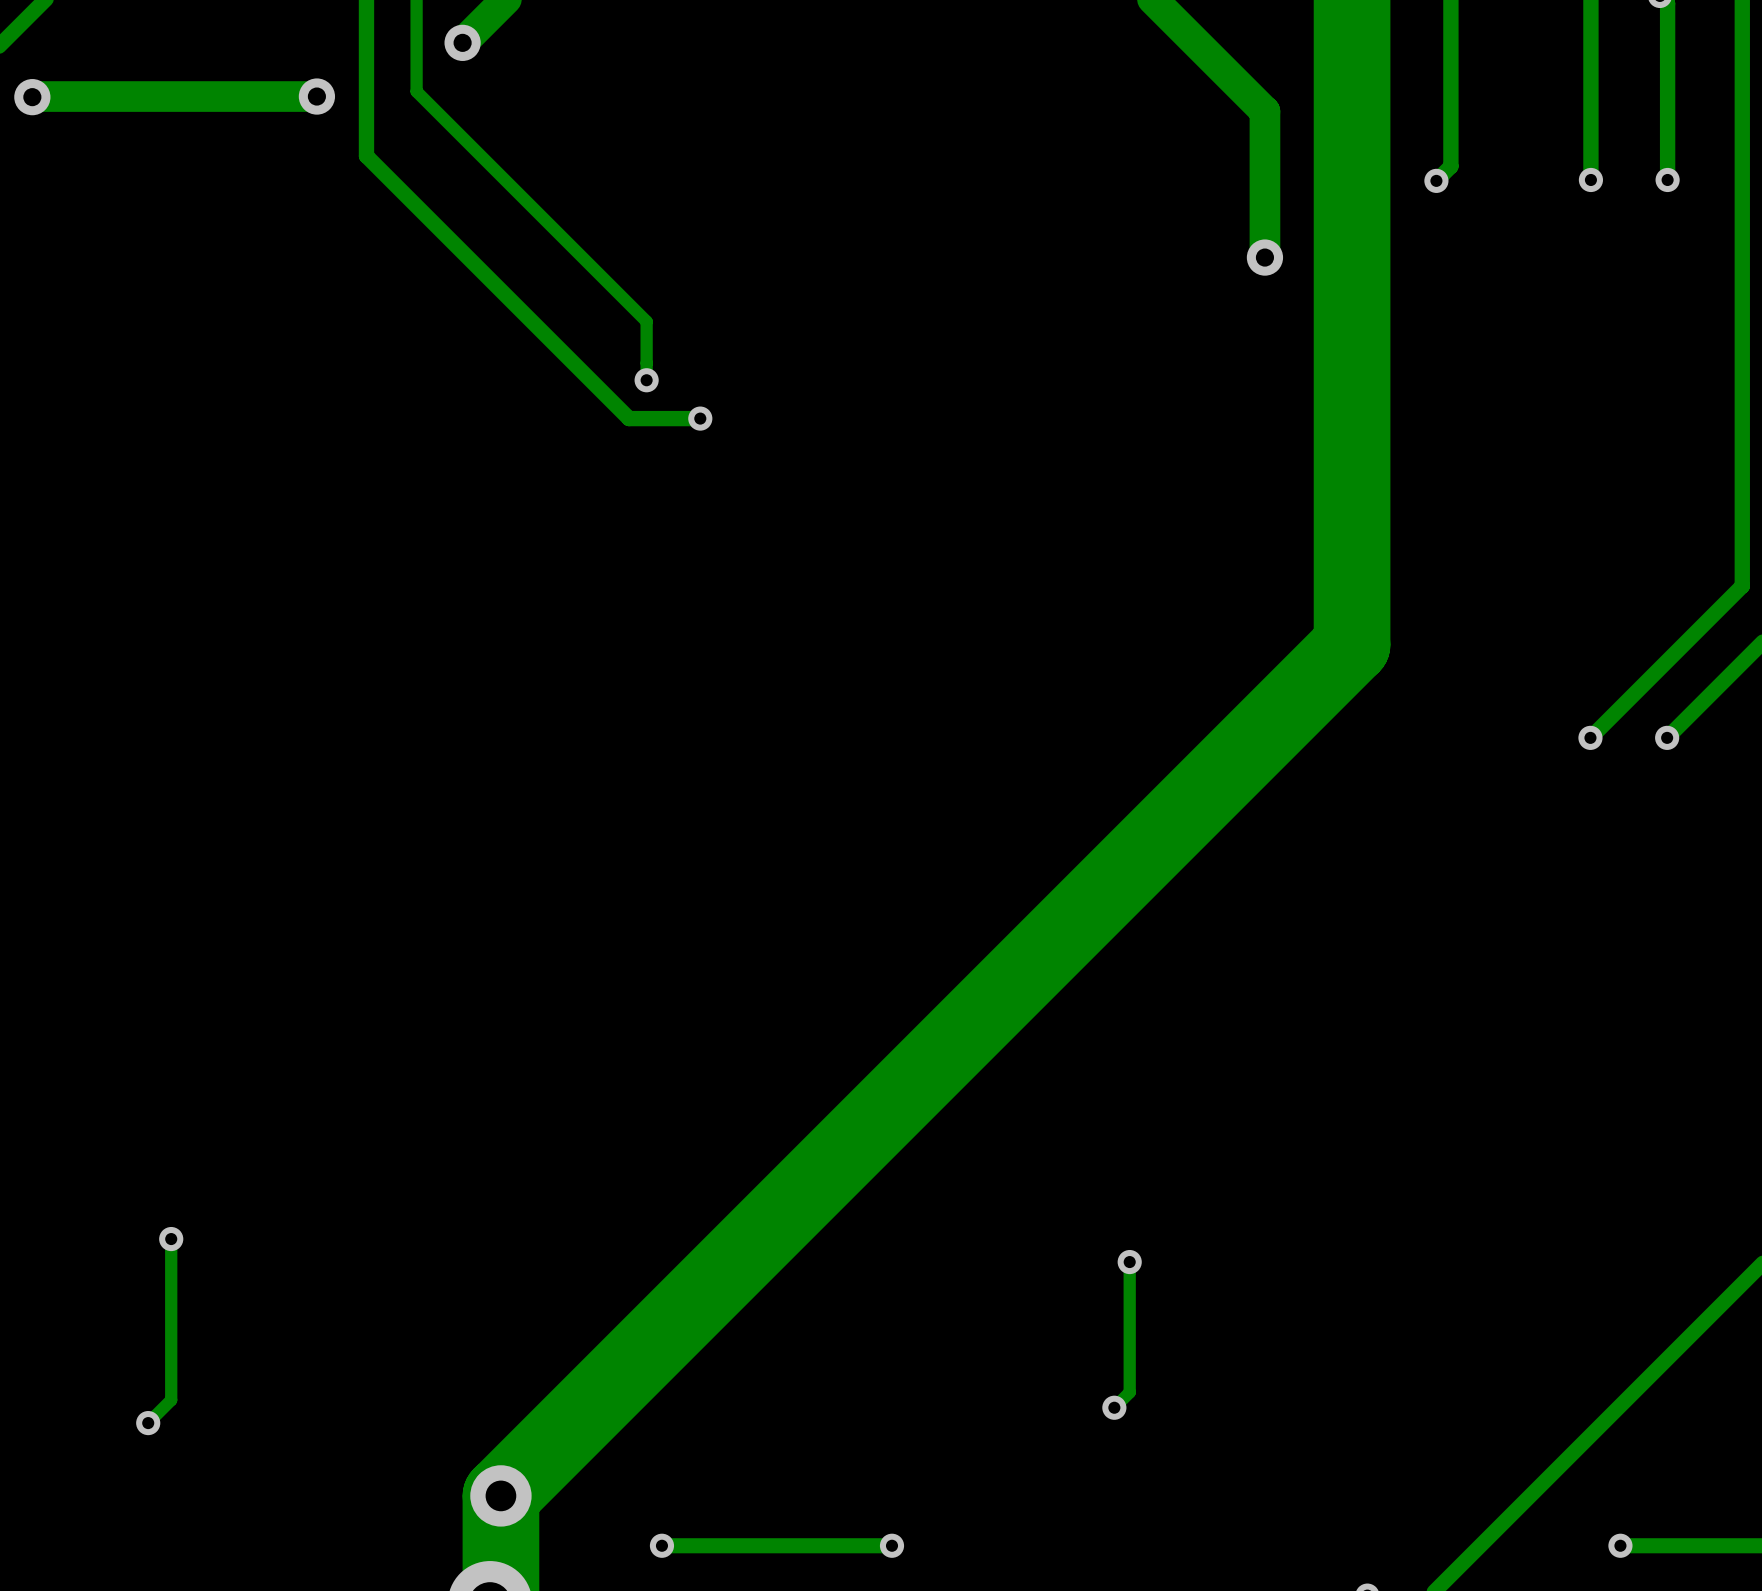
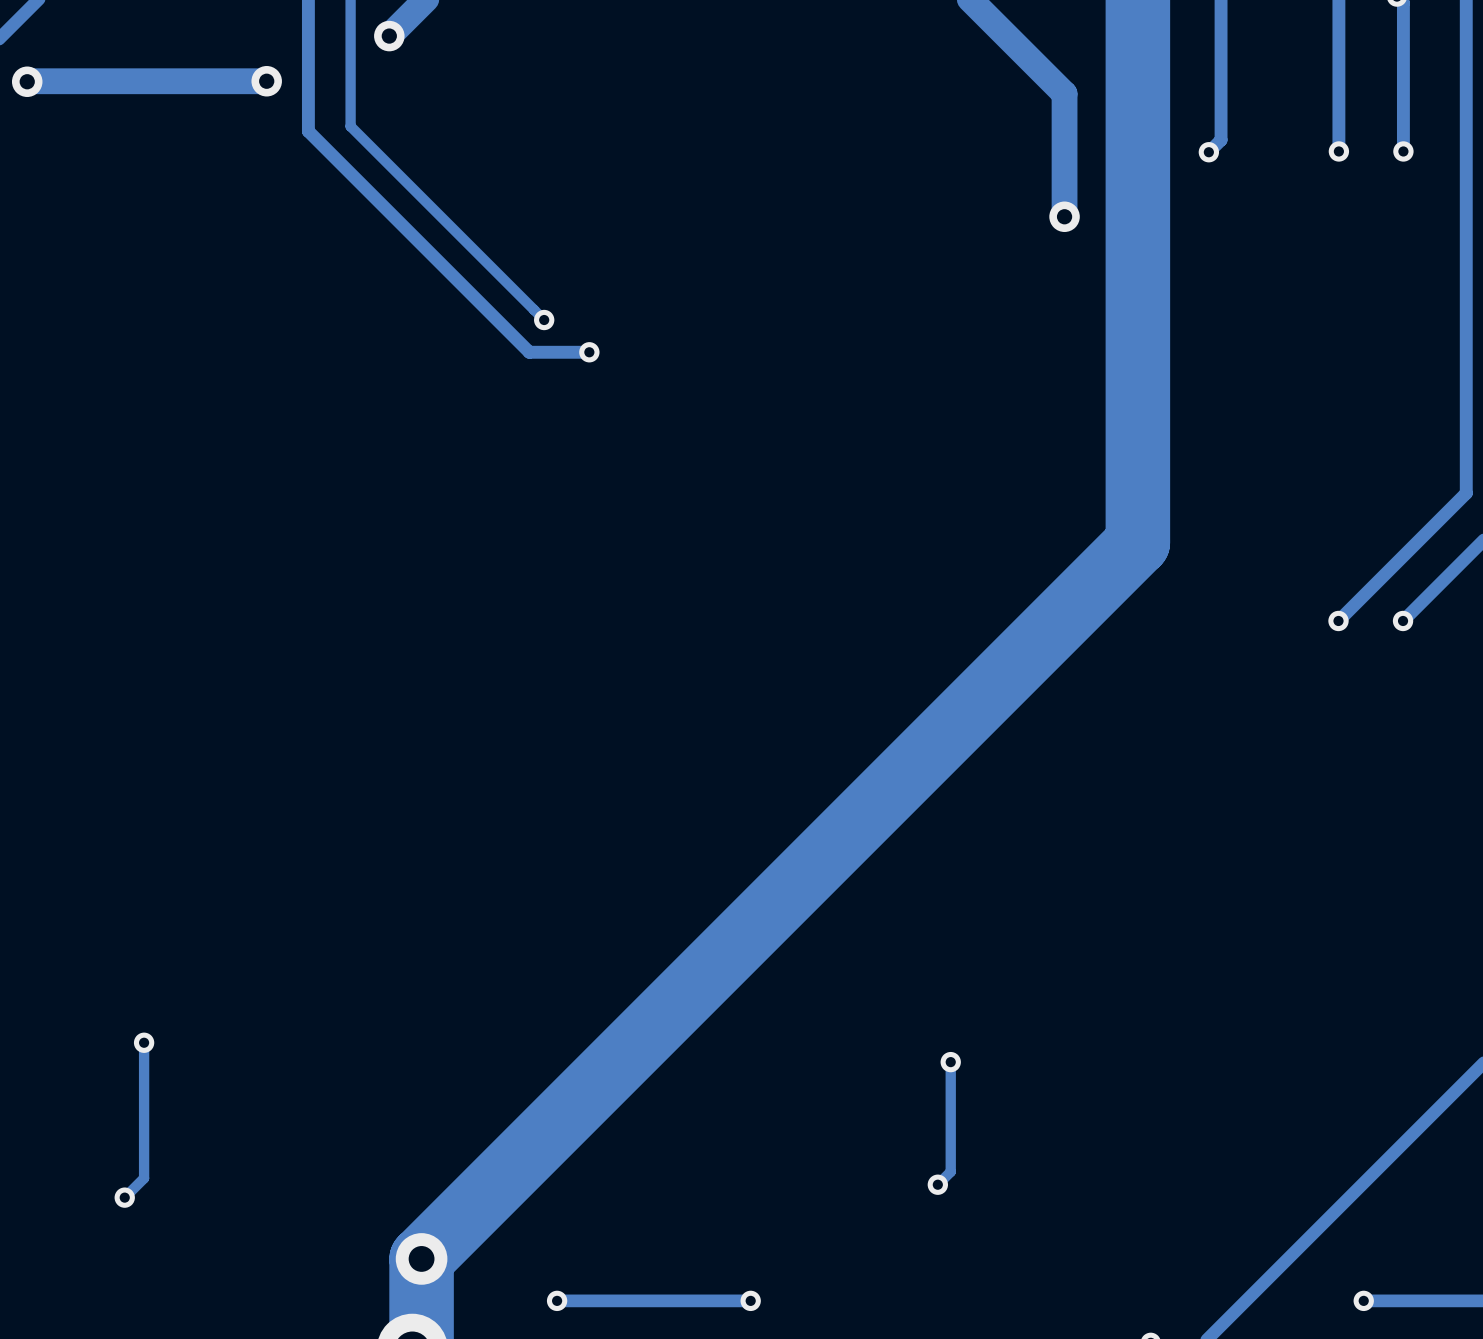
track: (416, 91) (646, 321) (646, 380) -> (350, 77) (350, 126) (544, 320)

